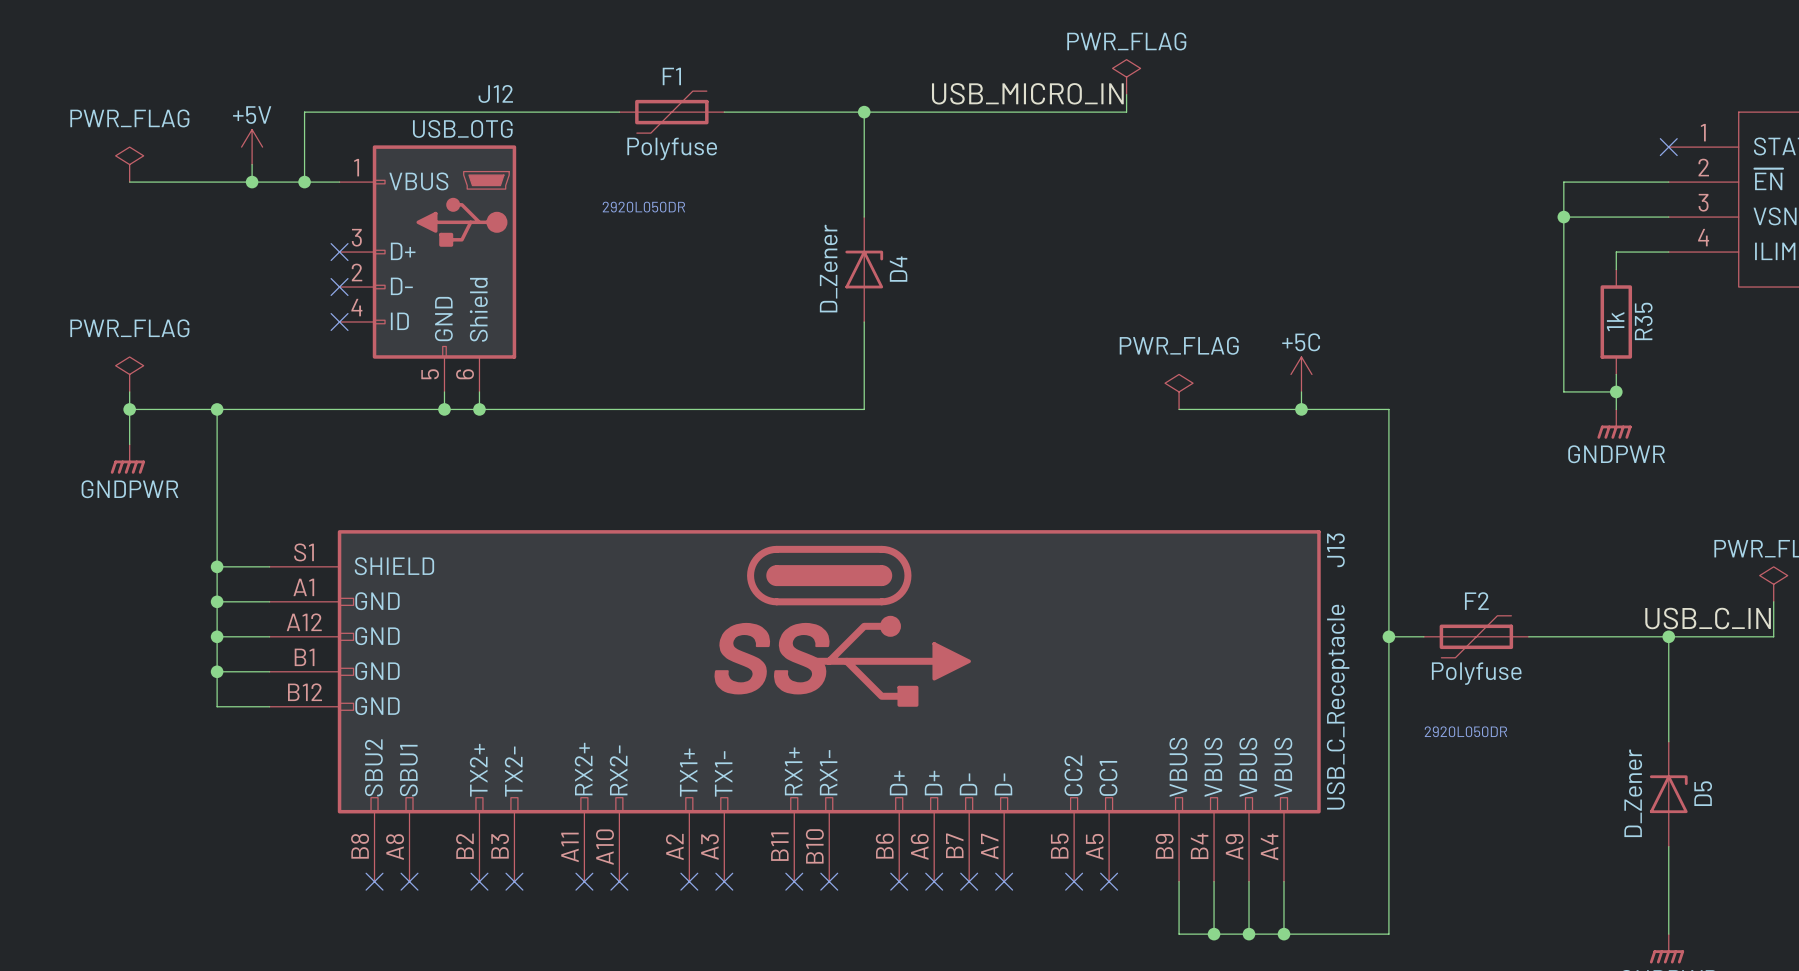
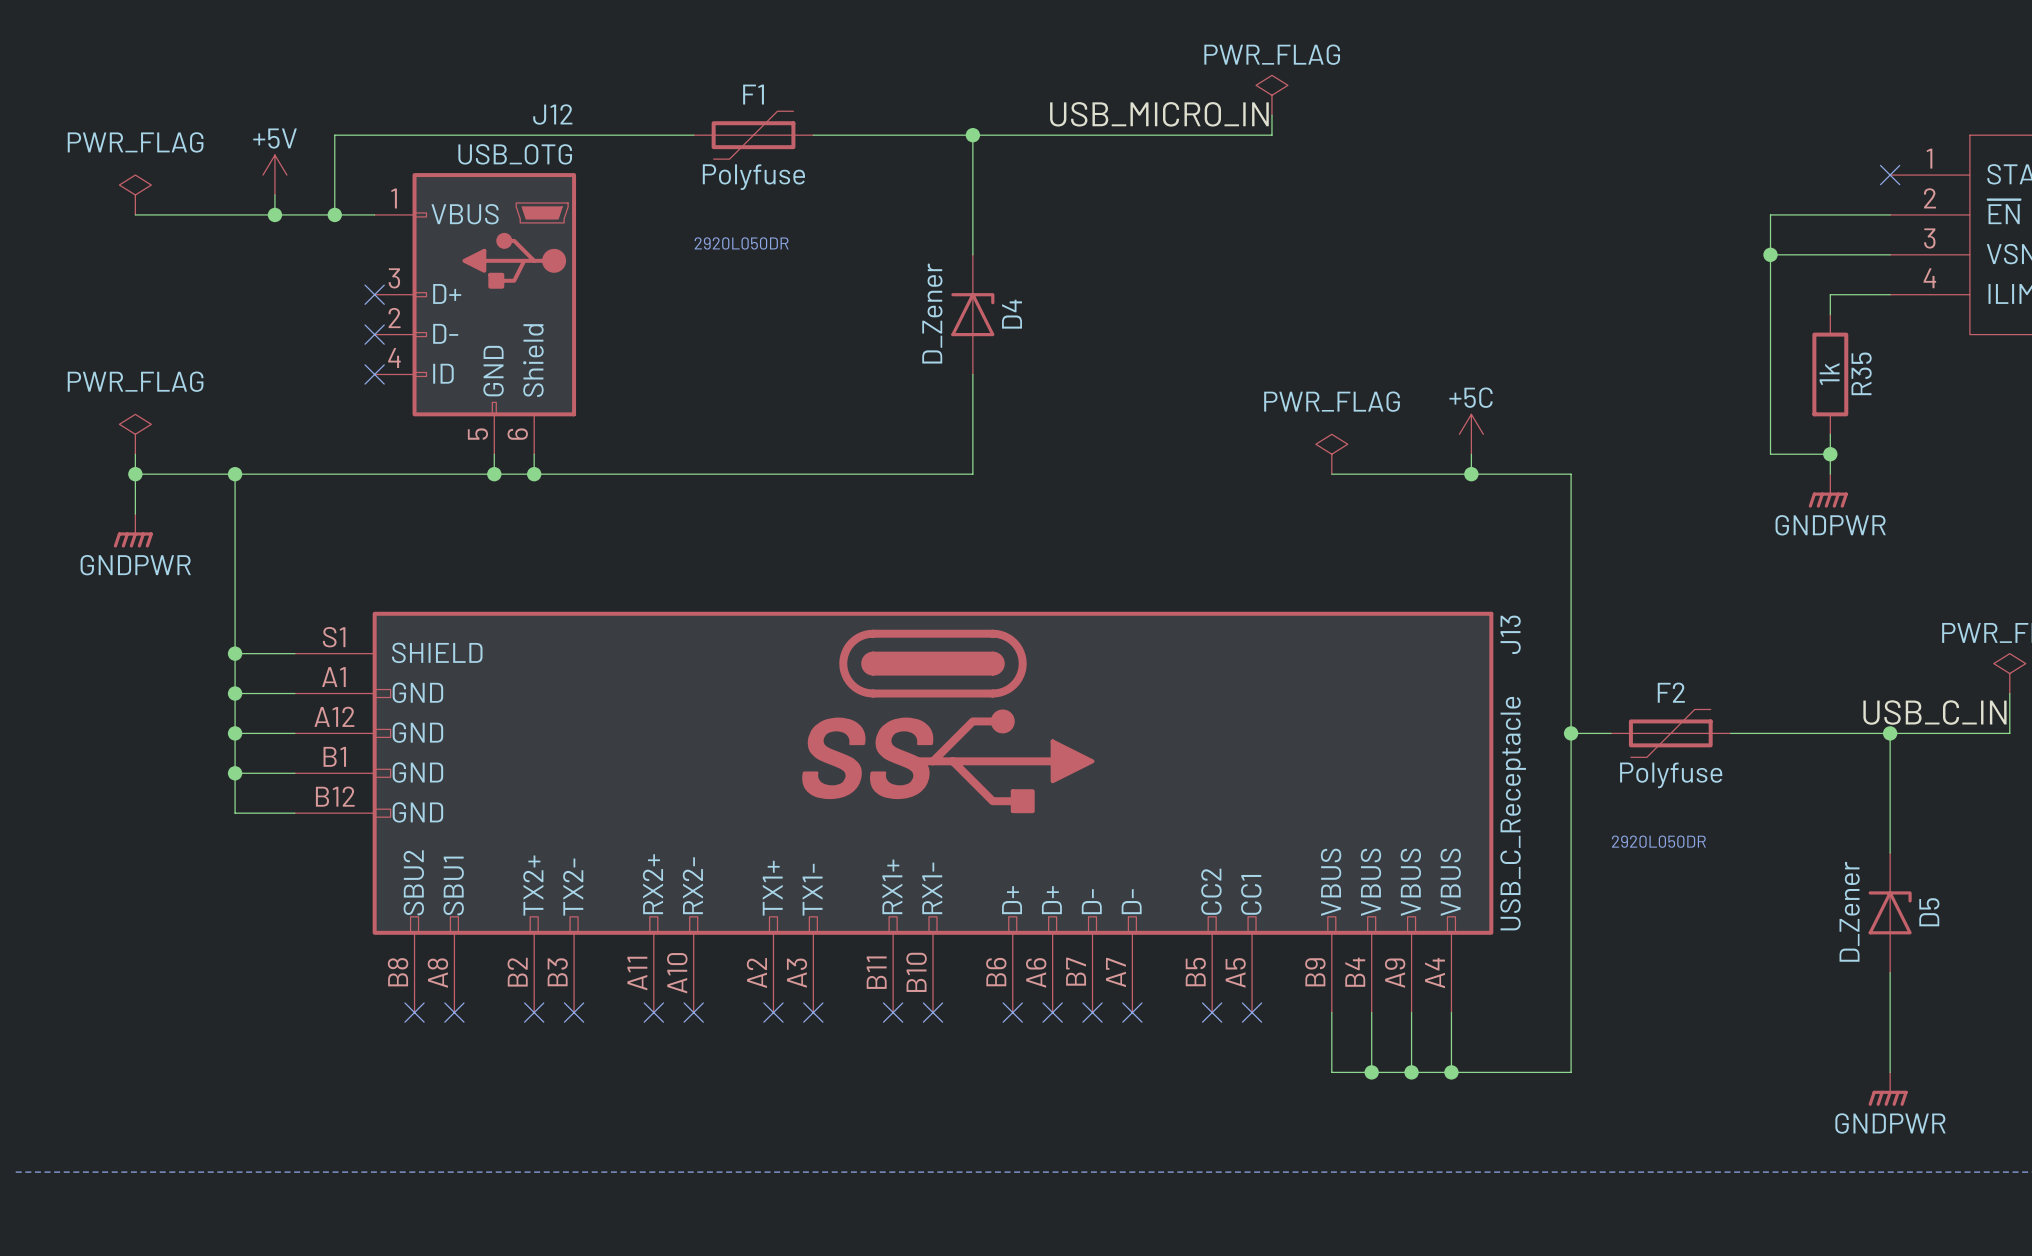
text position: 2920L050DR (643, 207) -> 2920L050DR (741, 243)

